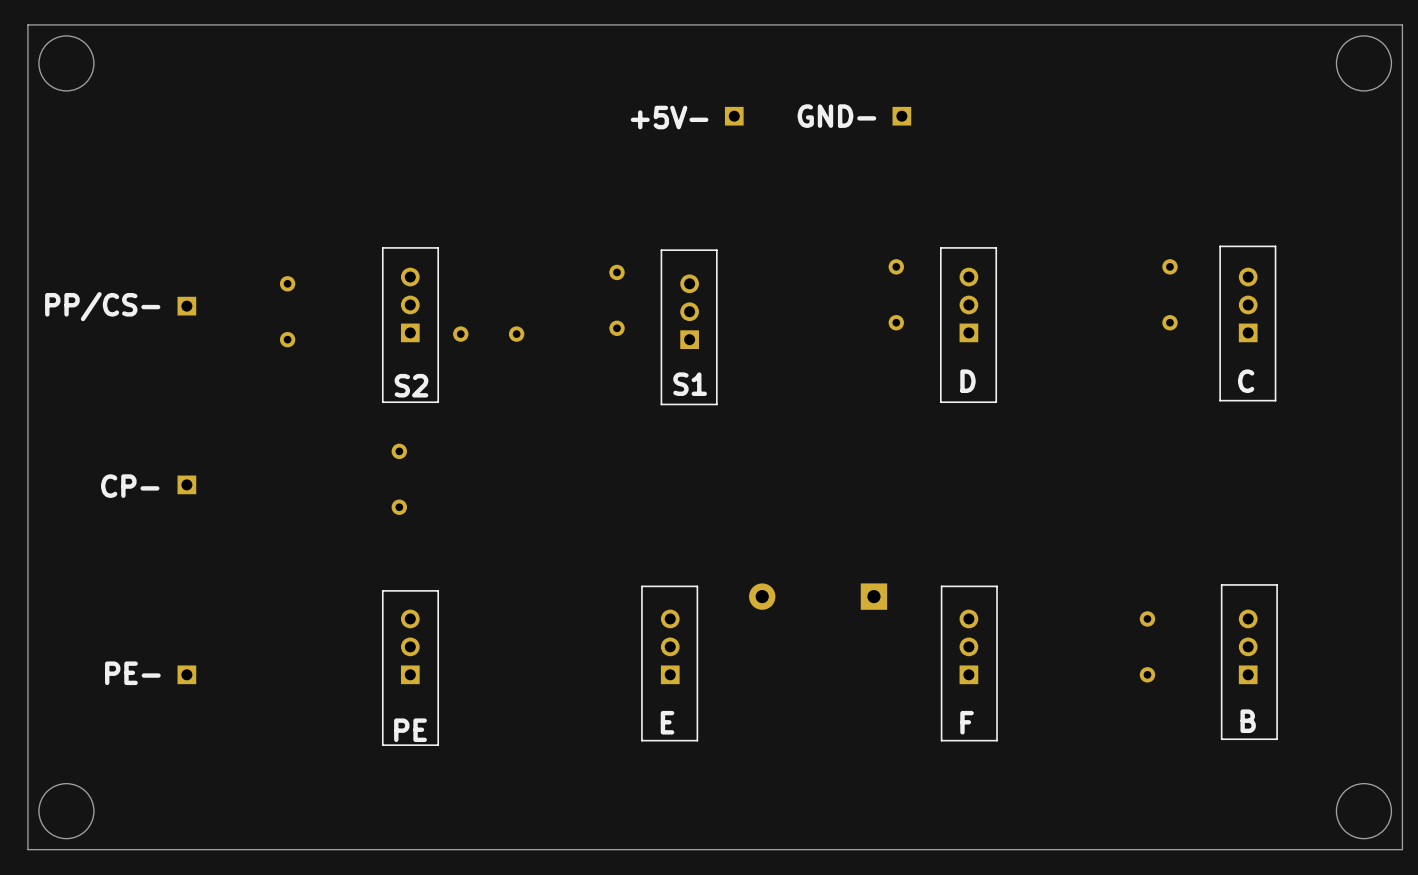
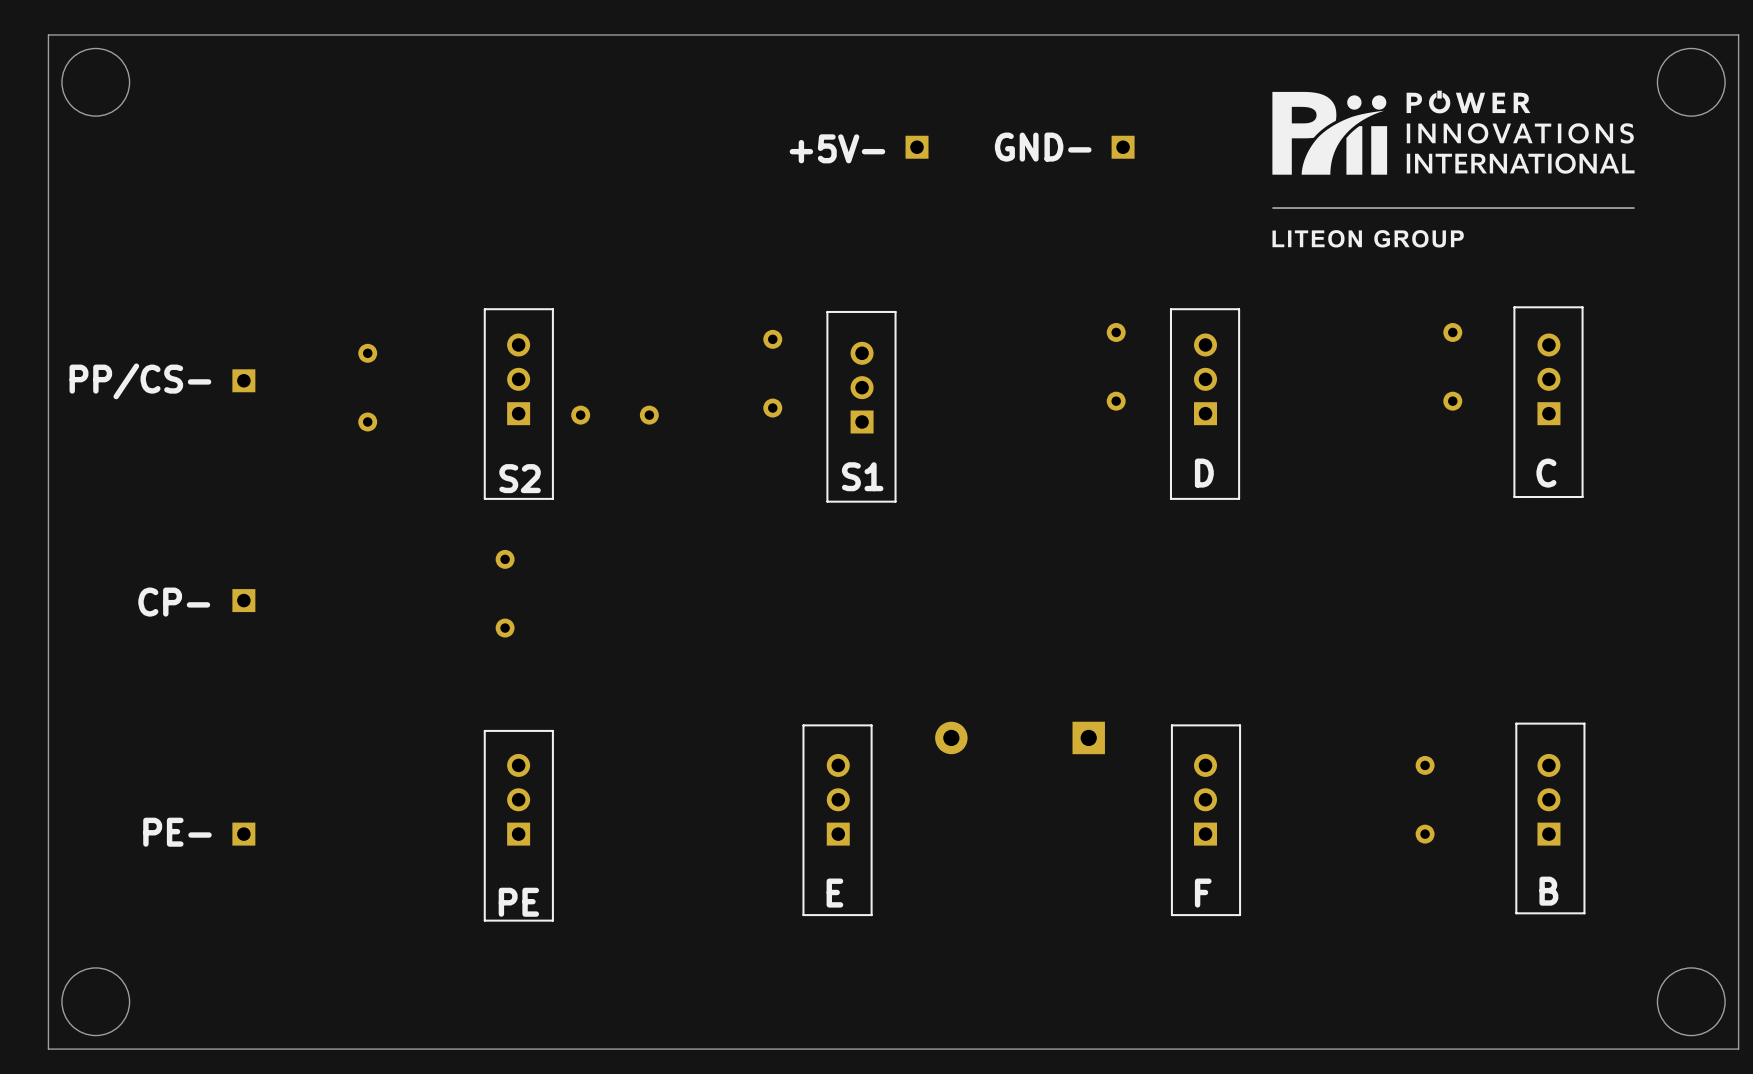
drawing: none -> [1406, 90, 1635, 174]
drawing: none -> [1272, 91, 1388, 175]
drawing: none -> [1272, 207, 1635, 209]
drawing: none -> [1272, 230, 1464, 248]

